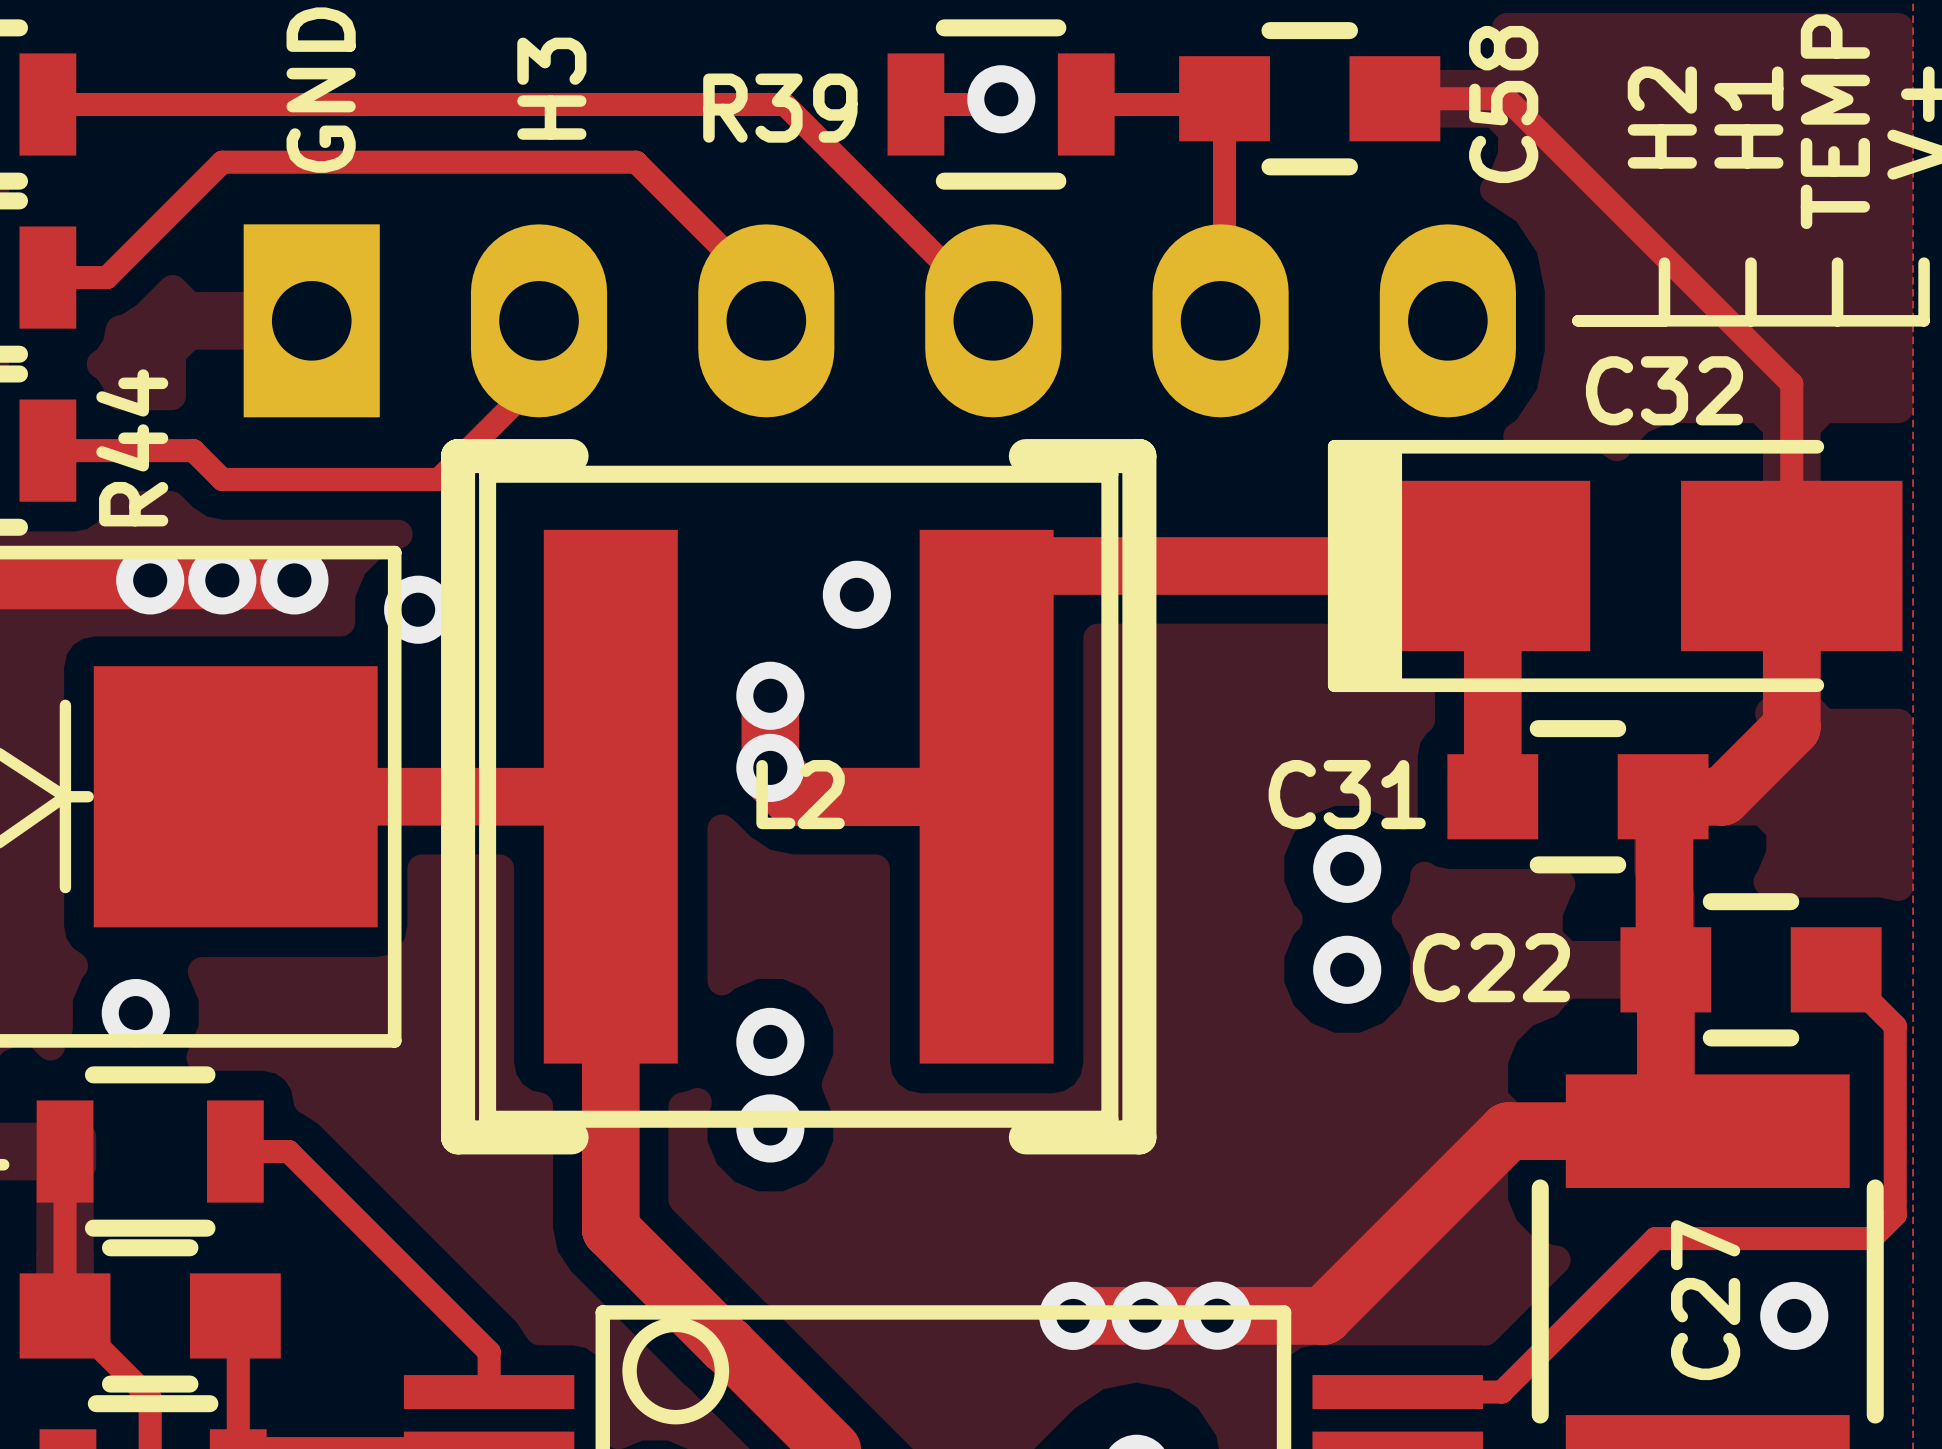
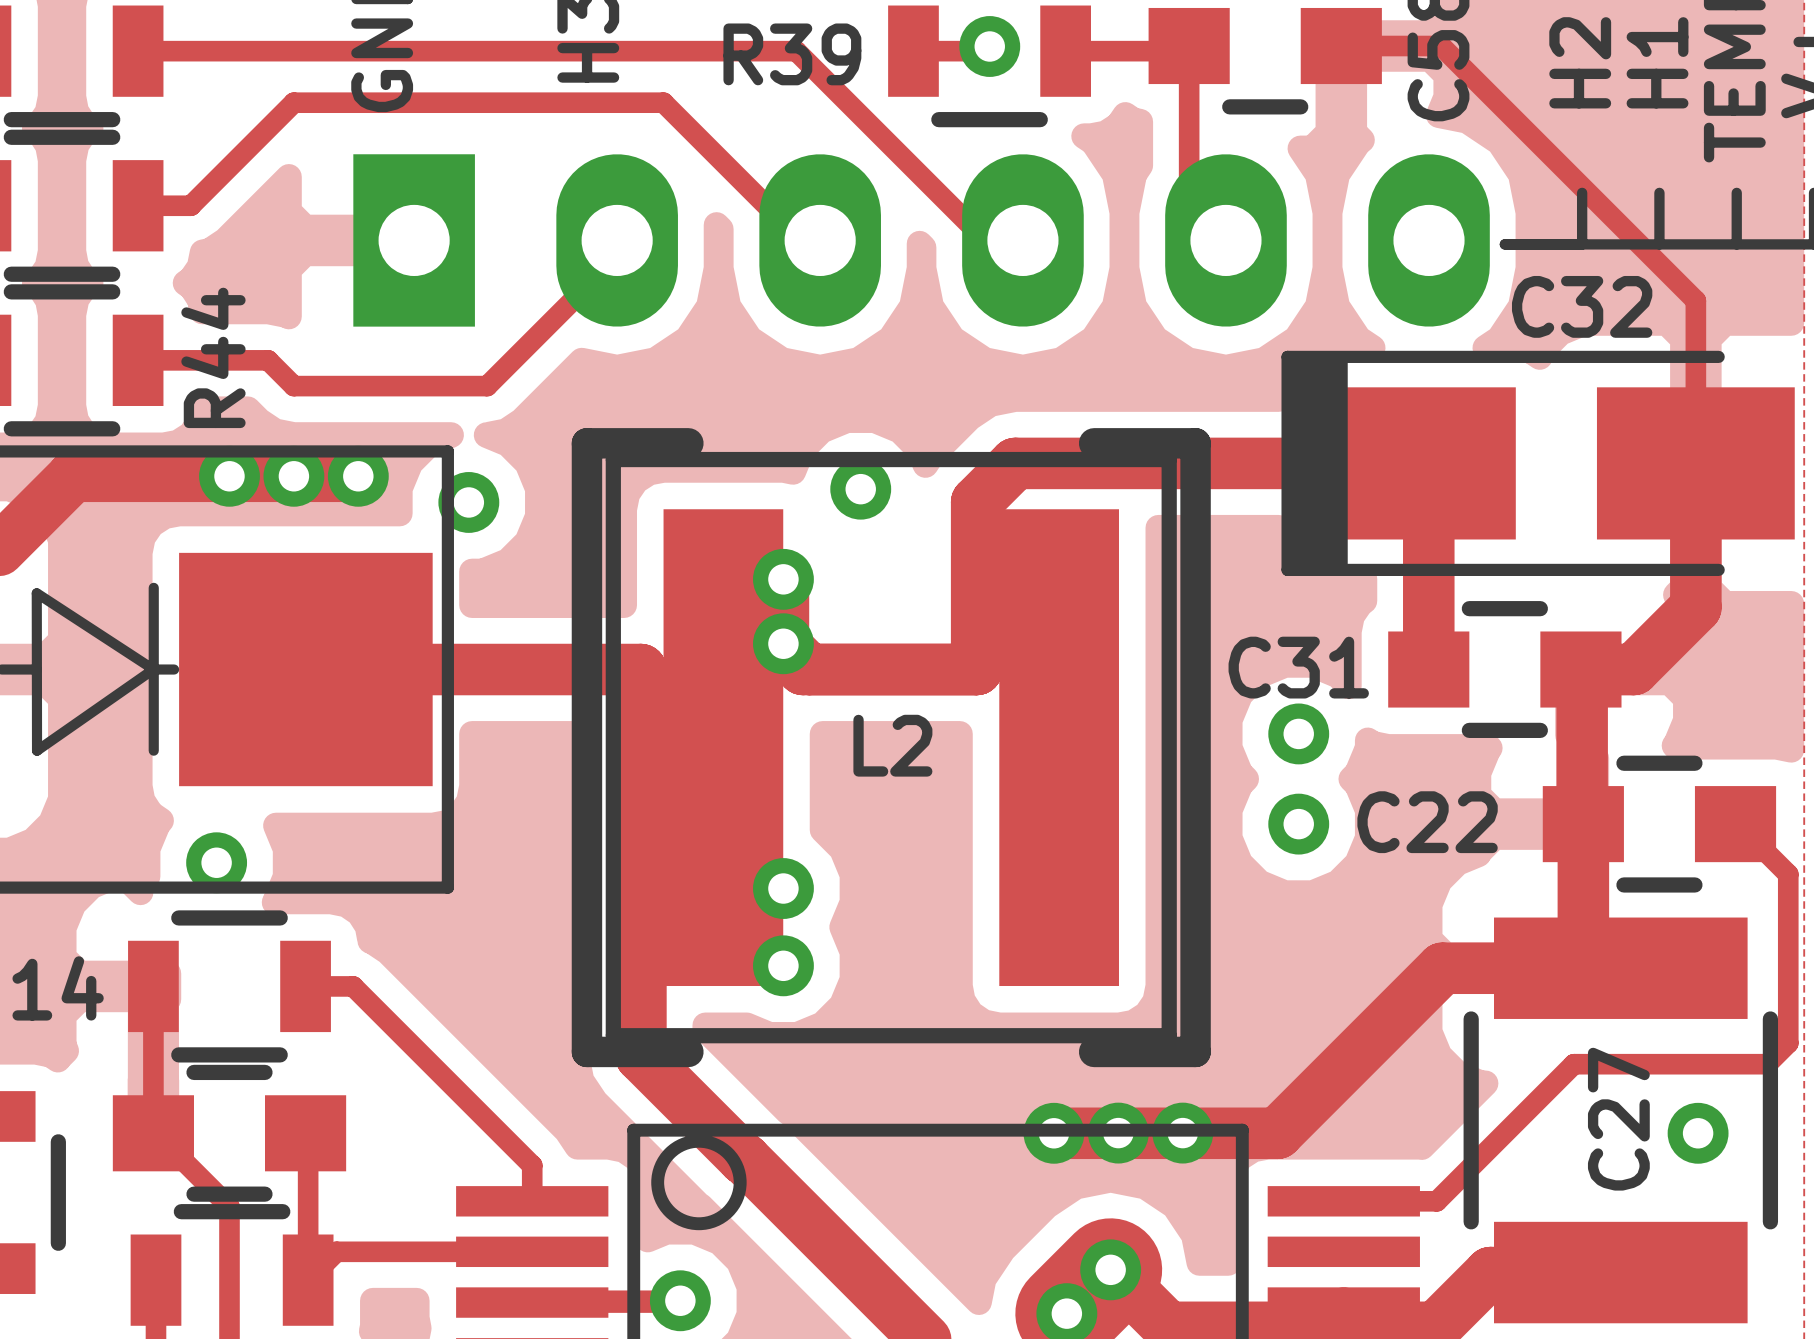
part position: (879, 320) -> (921, 240)
L2 position: (798, 796) -> (891, 747)

